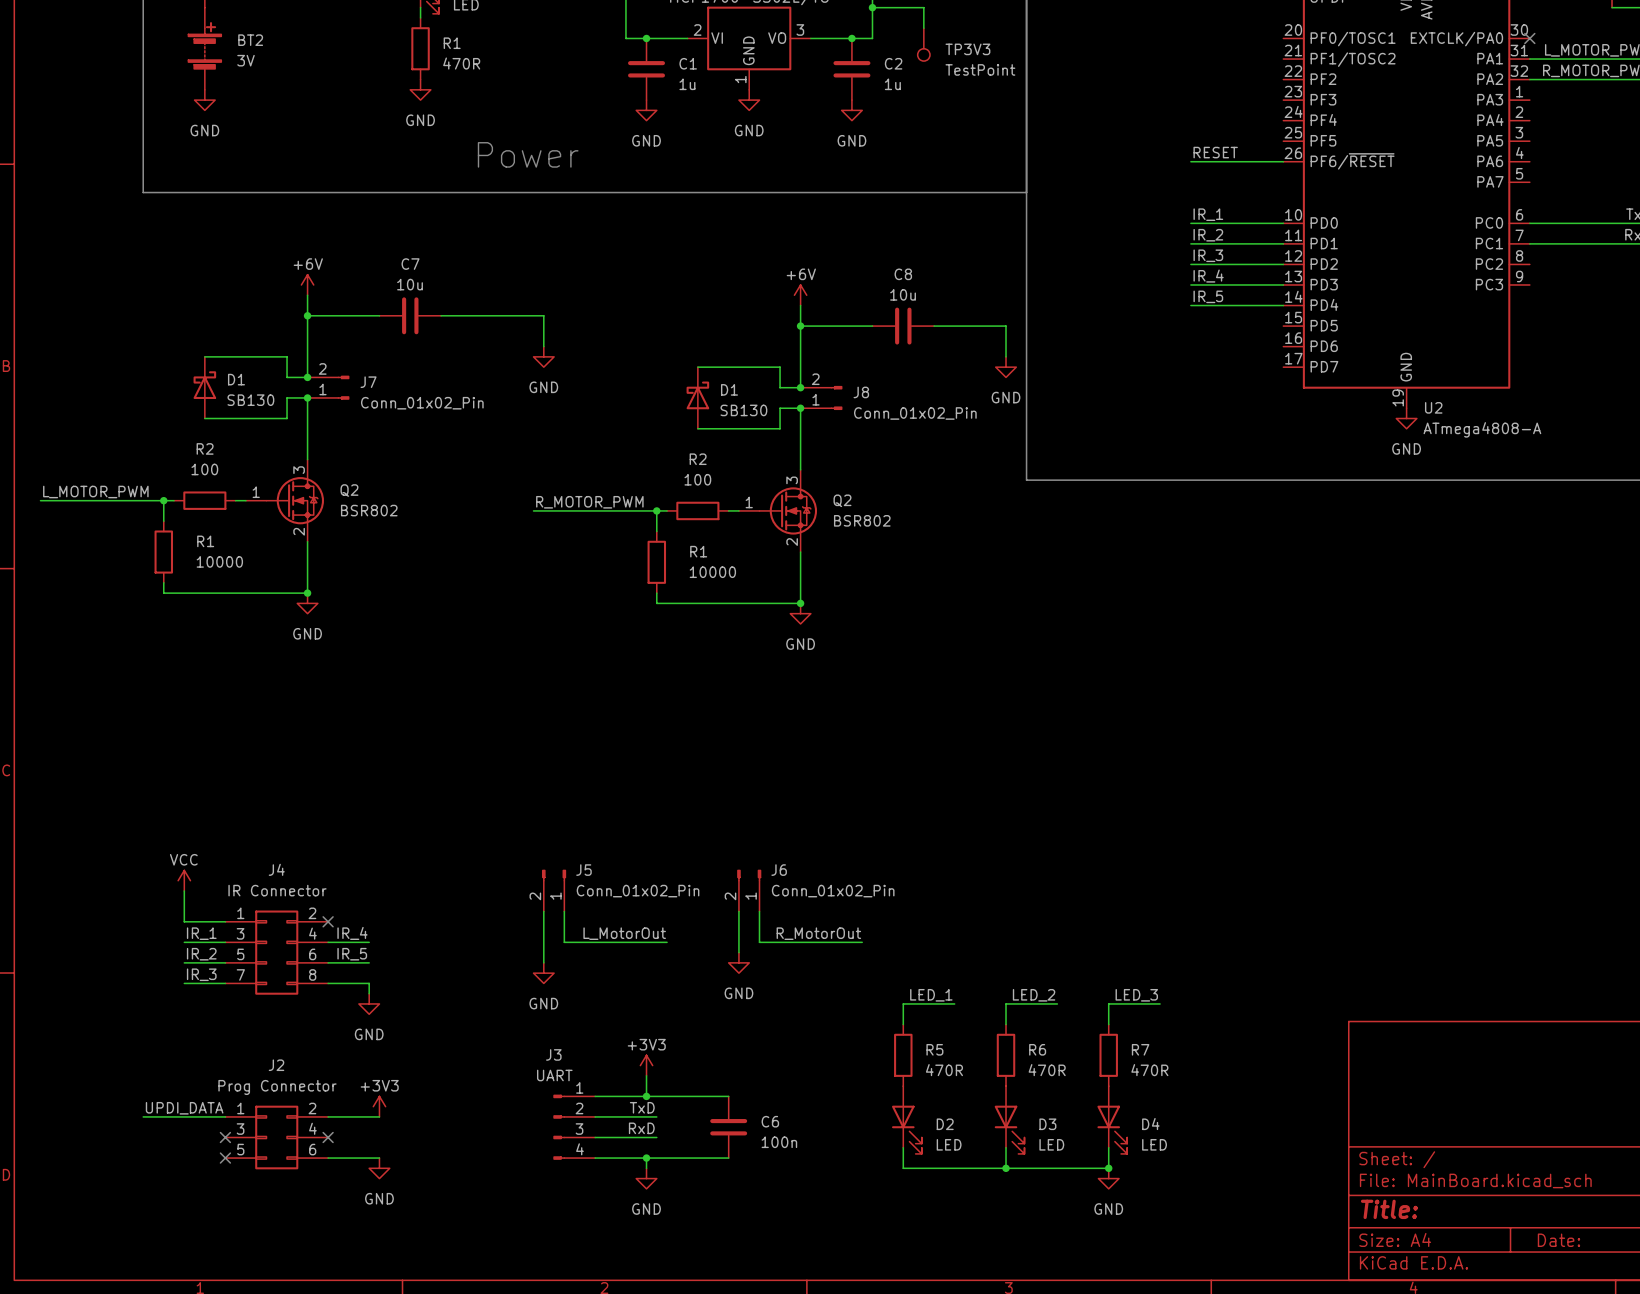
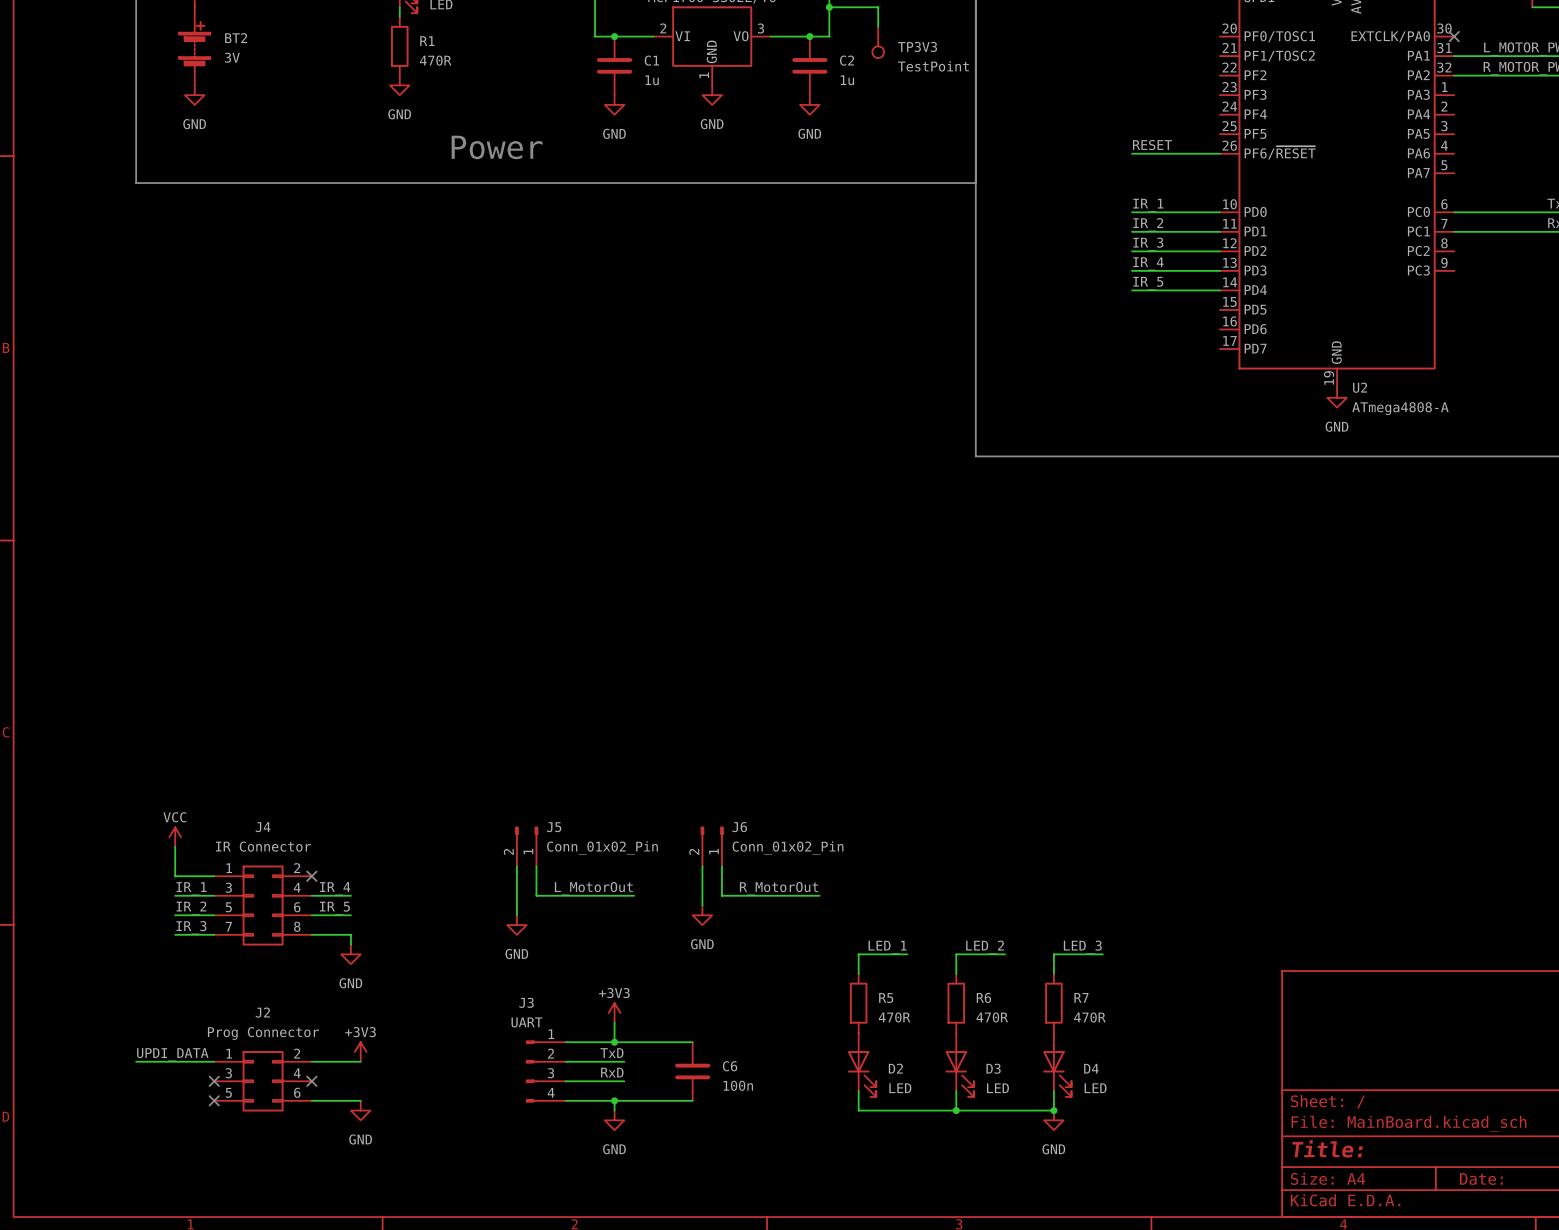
power symbol: +6V (307, 284) -> none
wire: (307, 295) (307, 377) (287, 377) (287, 356) (204, 356) -> none
power symbol: +6V (800, 295) -> none
wire: (800, 305) (800, 387) (780, 387) (780, 367) (697, 367) -> none
wire: (307, 315) (379, 315) -> none
junction: (307, 315) -> none
C7: 10u (410, 315) -> none
wire: (441, 315) (543, 315) (543, 346) -> none
wire: (800, 326) (872, 326) -> none
junction: (800, 326) -> none
C8: 10u (903, 326) -> none
wire: (934, 326) (1006, 326) (1006, 356) -> none
power symbol: GND (543, 356) -> none
power symbol: GND (1006, 367) -> none
junction: (307, 377) -> none
D1: SB130 (204, 387) -> none
J7: Conn_01x02_Pin (328, 387) -> none
junction: (800, 387) -> none
junction: (307, 397) -> none
D1: SB130 (697, 397) -> none
J8: Conn_01x02_Pin (821, 397) -> none
junction: (800, 408) -> none
wire: (204, 418) (287, 418) (287, 397) (307, 397) (307, 459) -> none
wire: (697, 428) (780, 428) (780, 408) (800, 408) (800, 469) -> none
label: L_MOTOR_PWM (95, 492) -> none
wire: (40, 500) (174, 500) -> none
wire: (163, 500) (163, 521) -> none
junction: (163, 500) -> none
R2: 100 (204, 500) -> none
wire: (235, 500) (245, 500) -> none
Q2: BSR802 (284, 500) -> none
label: R_MOTOR_PWM (589, 502) -> none
wire: (533, 510) (667, 510) -> none
wire: (656, 510) (656, 531) -> none
junction: (656, 510) -> none
R2: 100 (697, 510) -> none
wire: (728, 510) (738, 510) -> none
Q2: BSR802 (777, 510) -> none
wire: (307, 541) (307, 593) (163, 593) (163, 582) -> none
R1: 10000 (163, 552) -> none
wire: (800, 552) (800, 603) (656, 603) (656, 593) -> none
R1: 10000 (656, 562) -> none
junction: (307, 593) -> none
power symbol: GND (307, 603) -> none
junction: (800, 603) -> none
power symbol: GND (800, 613) -> none

